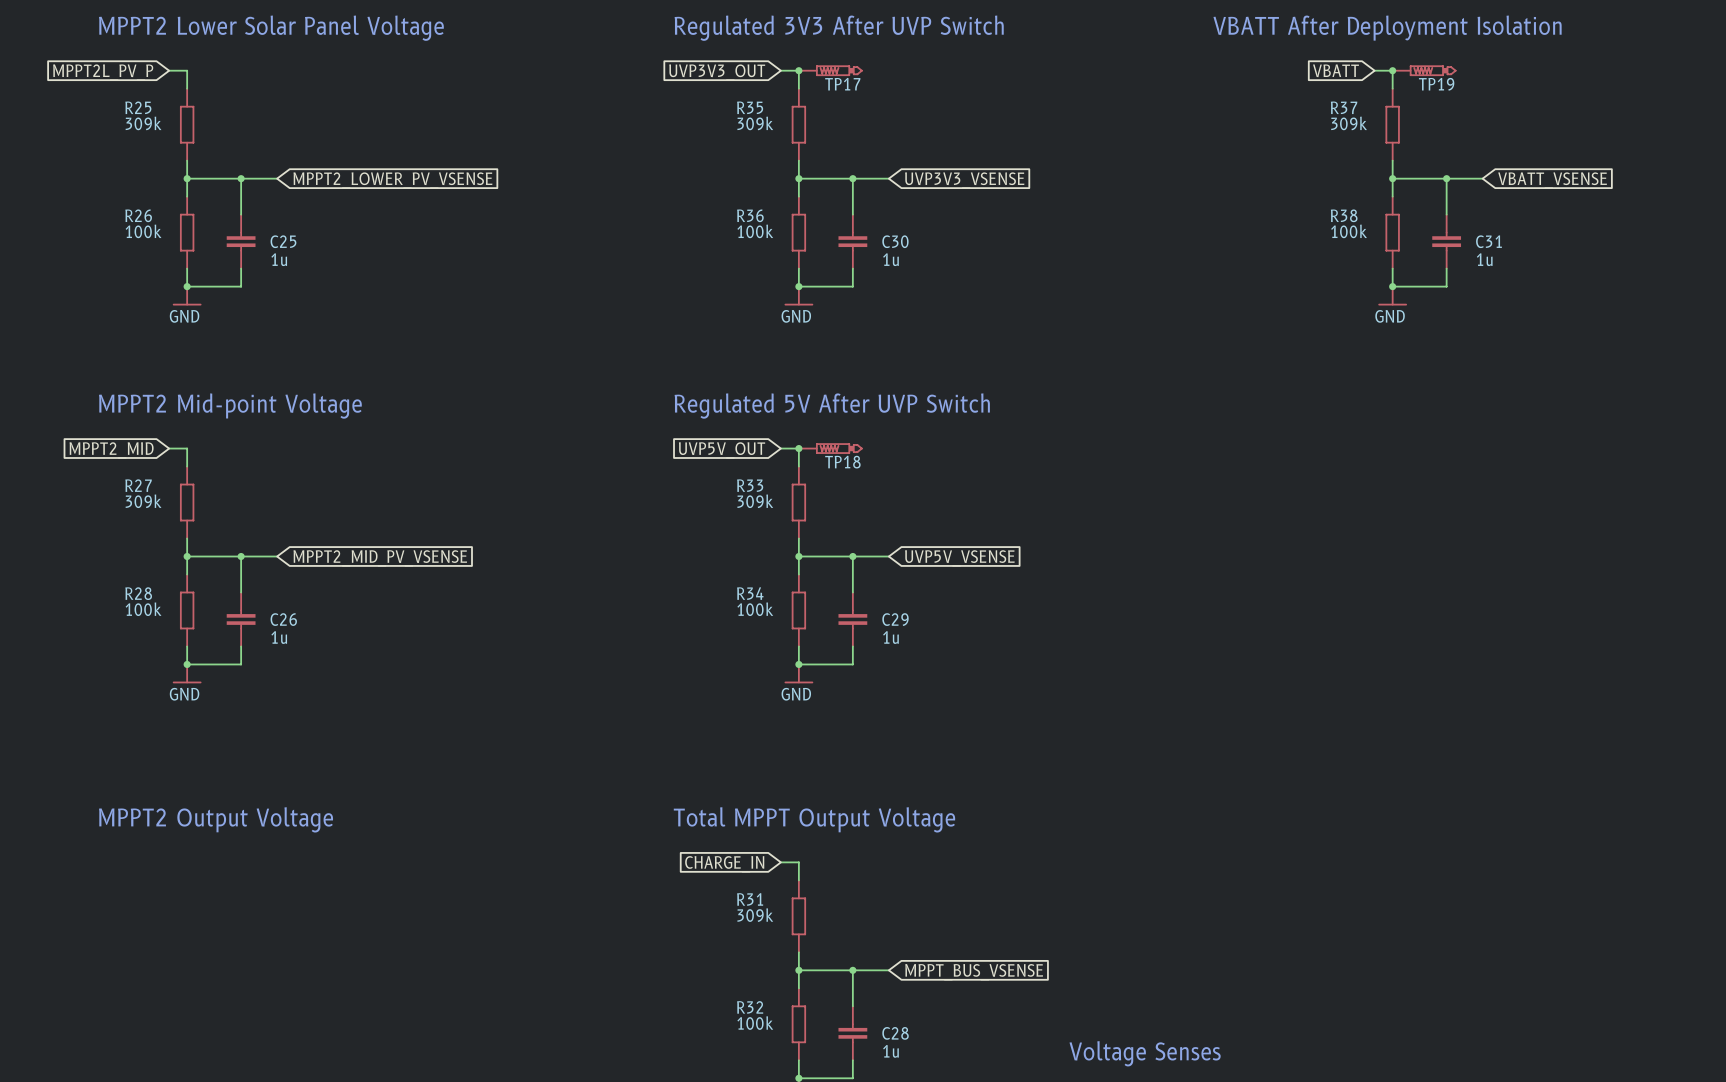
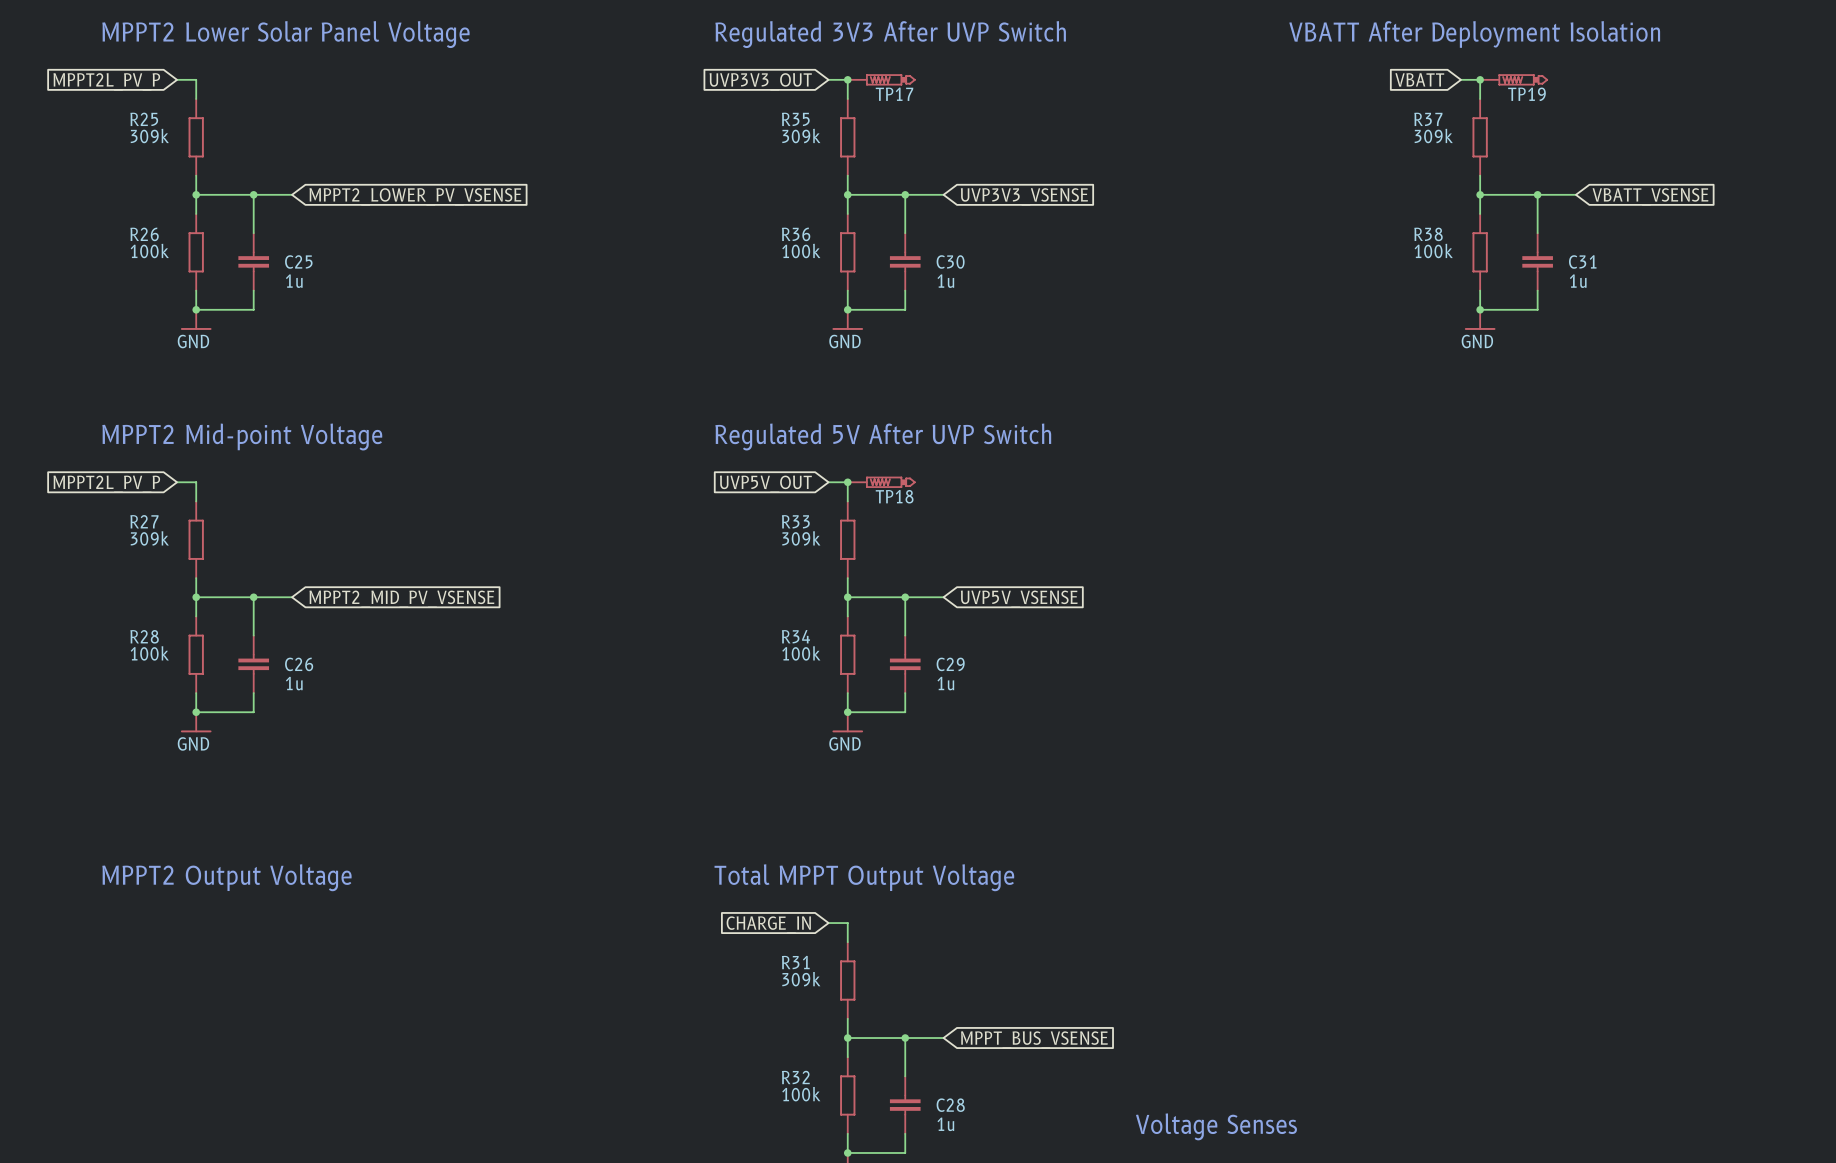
global label: MPPT2_MID (111, 450) -> MPPT2L_PV_P (106, 484)

